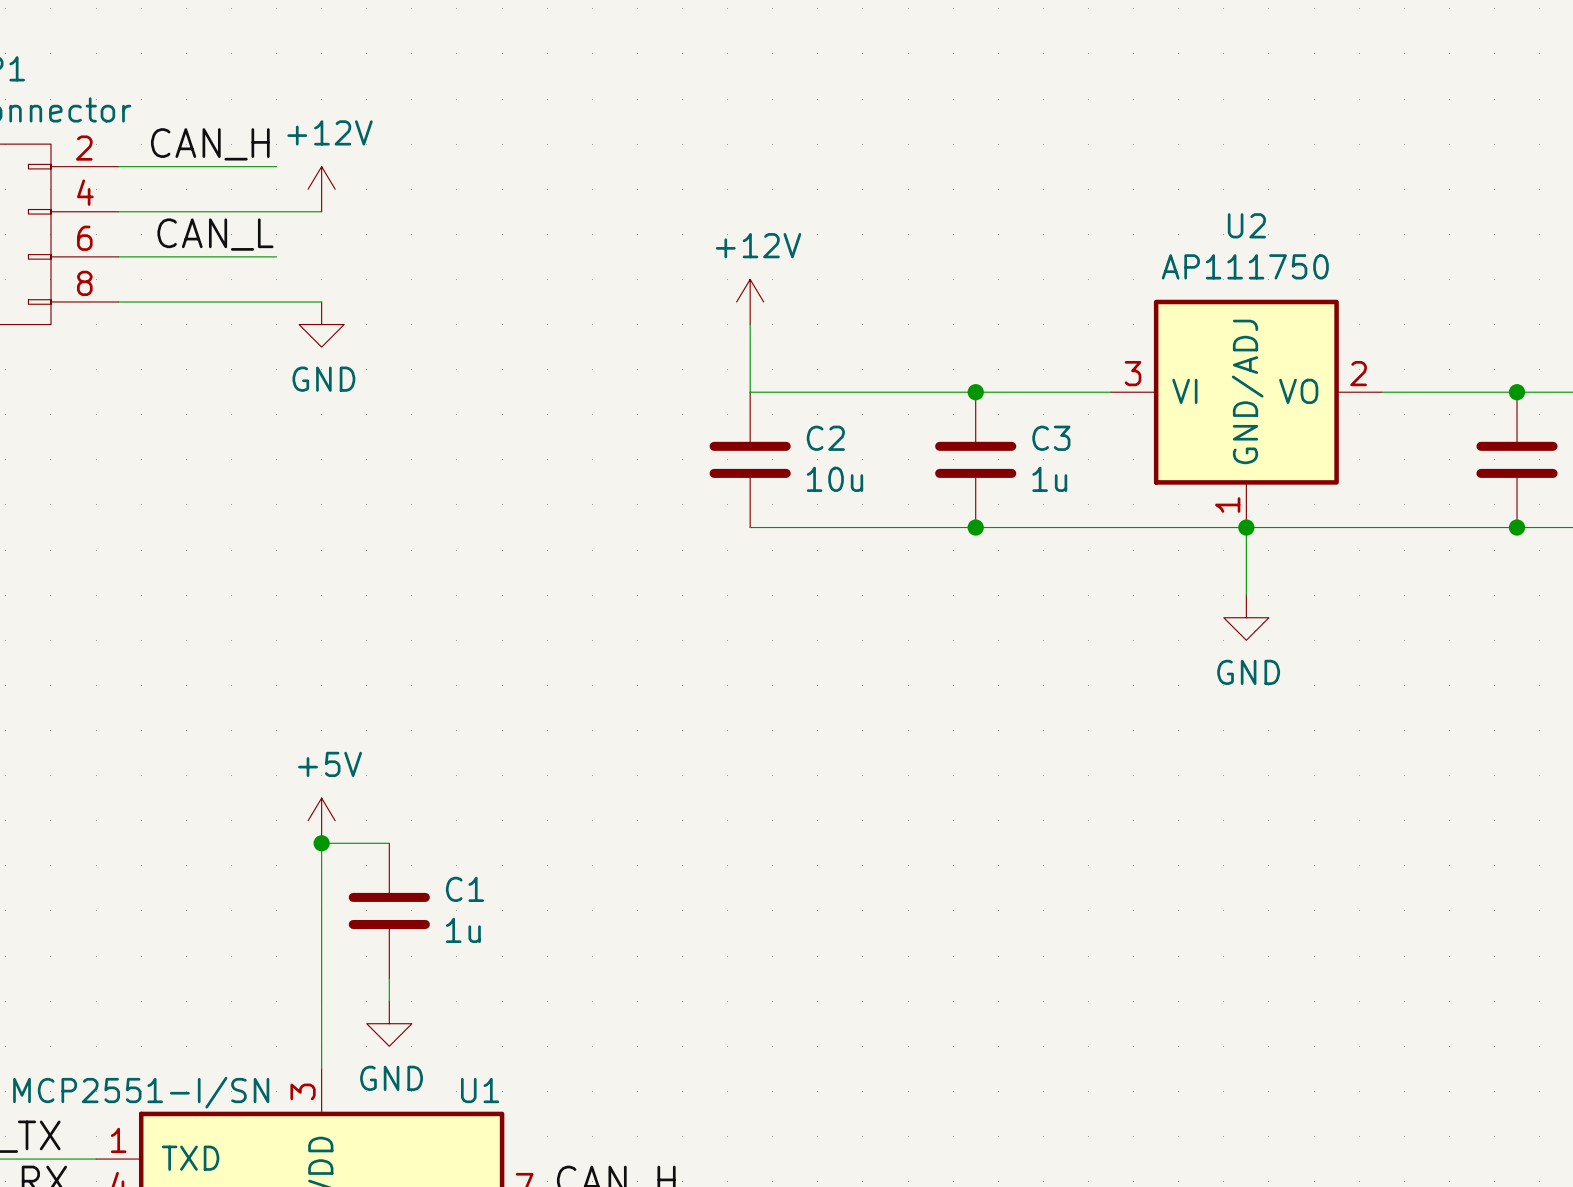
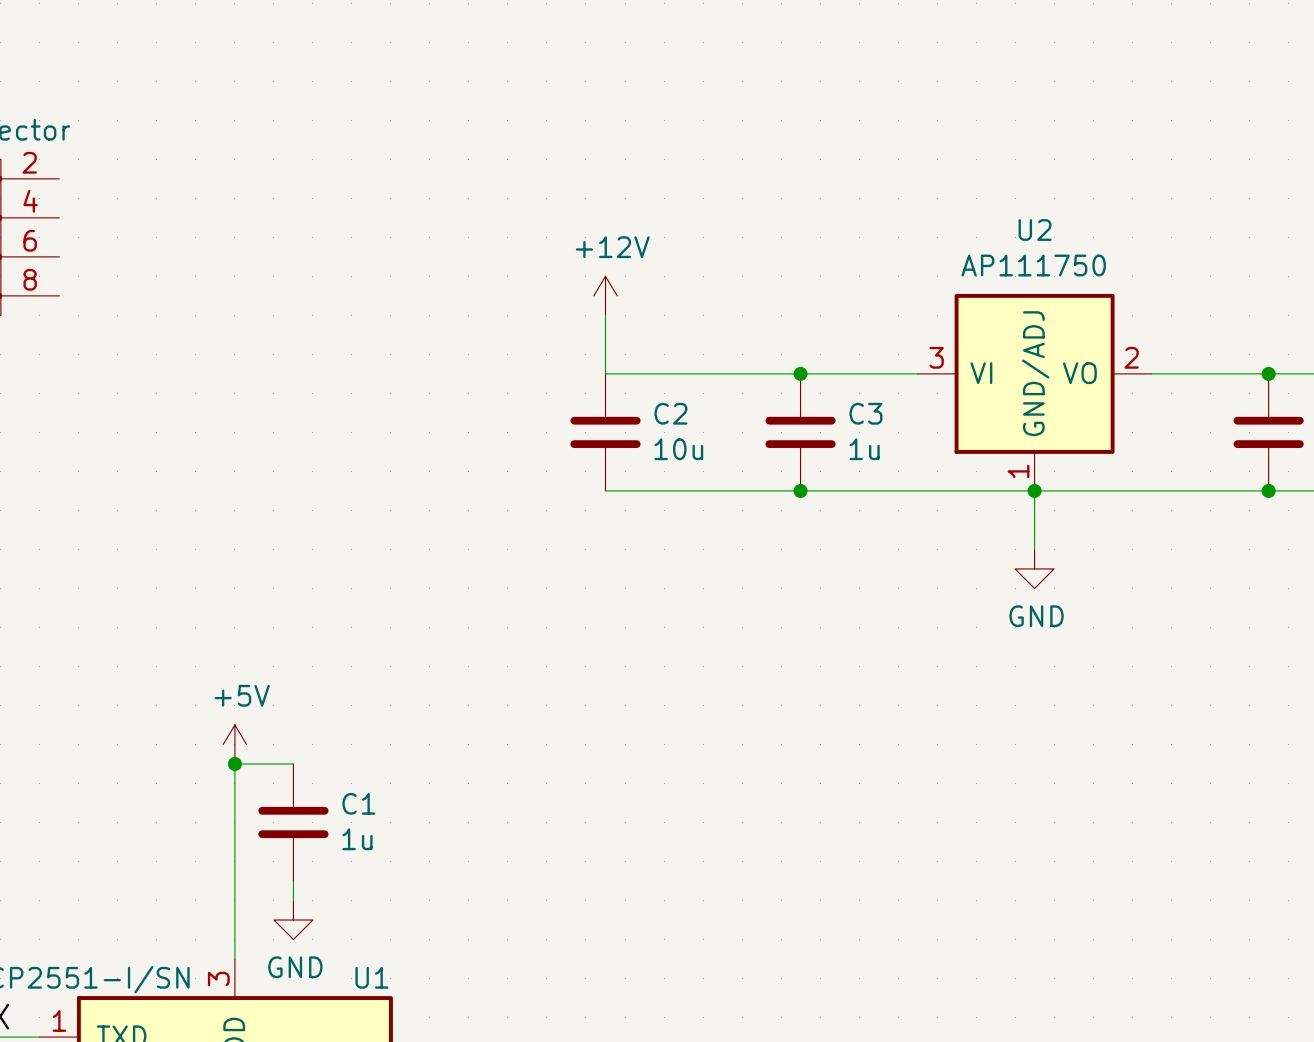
label: CAN_H (210, 144) -> none
wire: (118, 166) (276, 166) -> none
power symbol: +12V (321, 189) -> none
wire: (118, 211) (321, 211) -> none
label: CAN_L (215, 234) -> none
wire: (118, 256) (276, 256) -> none
wire: (118, 301) (321, 301) -> none
power symbol: GND (321, 324) -> none

